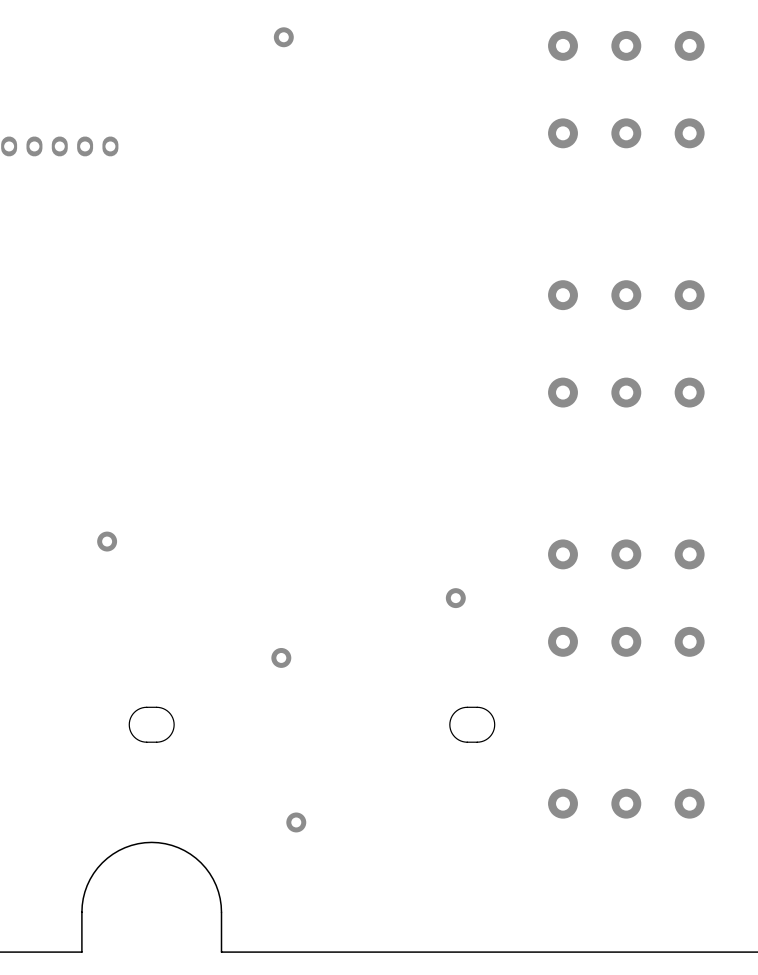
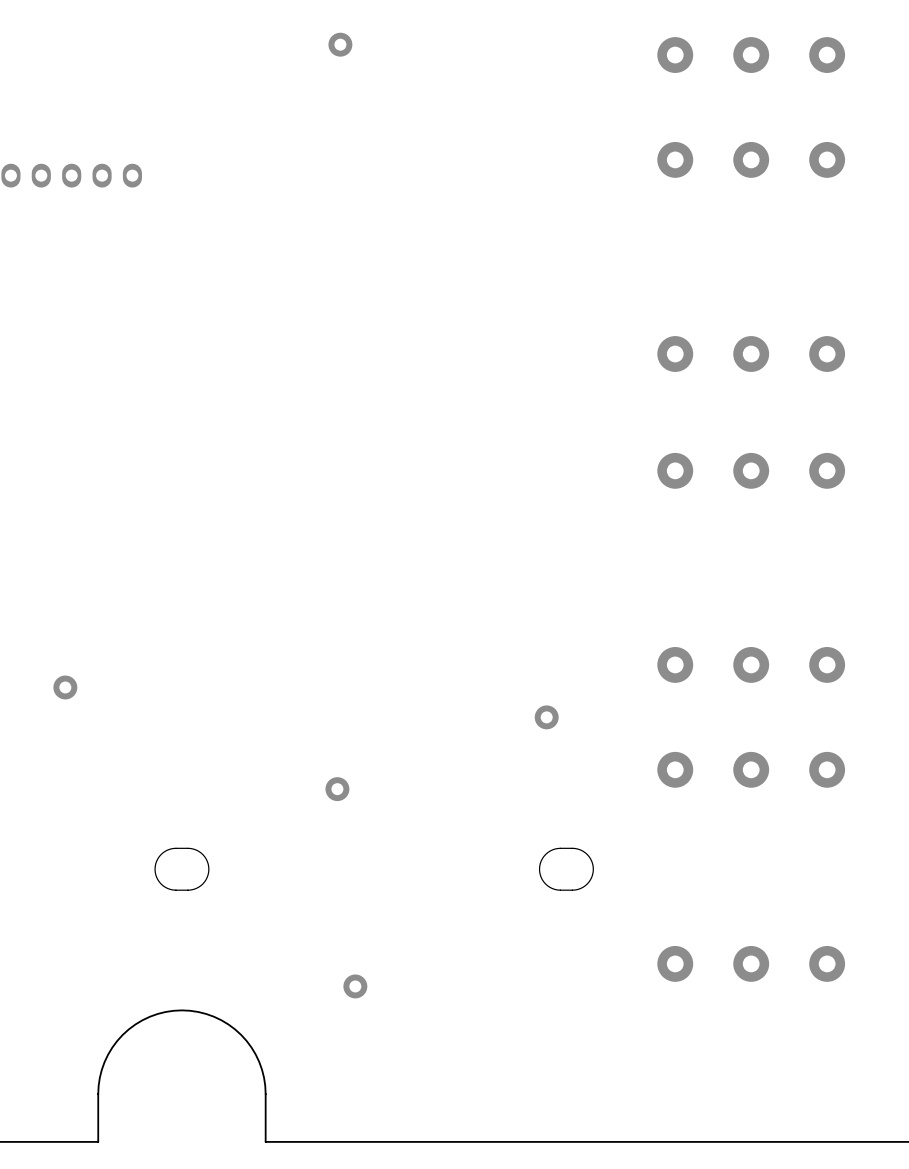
part position: (107, 541) -> (65, 687)

